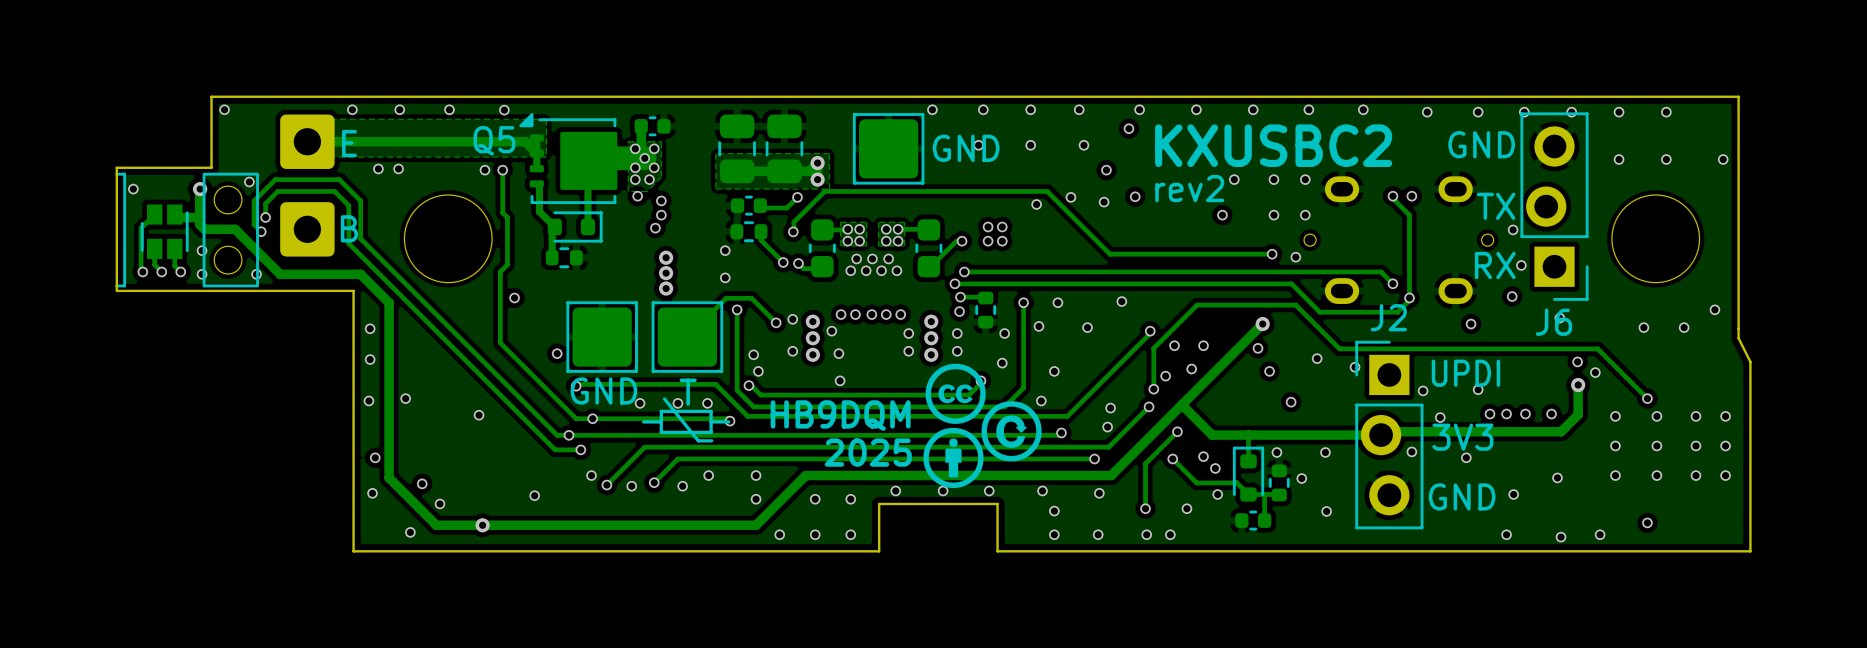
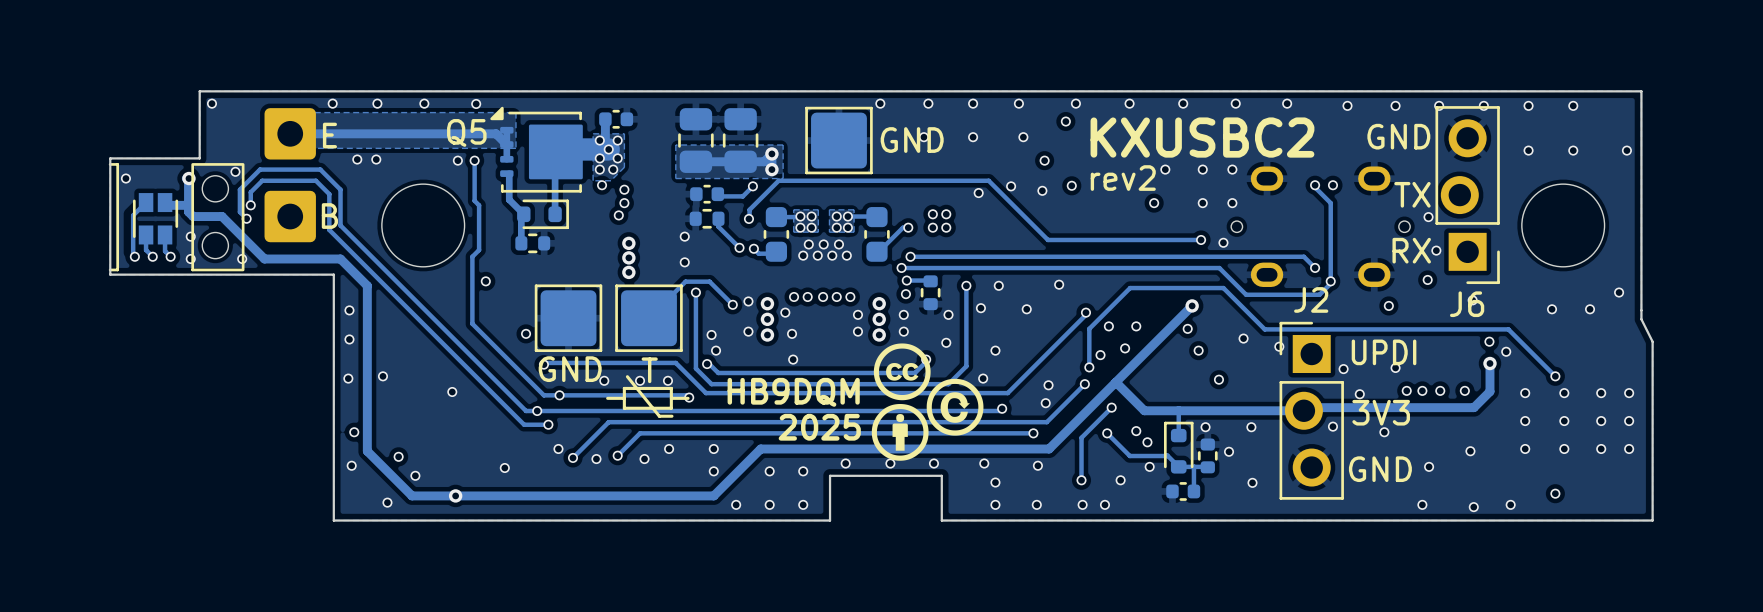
part rotation: 0° (164, 231) -> 180° (155, 218)

